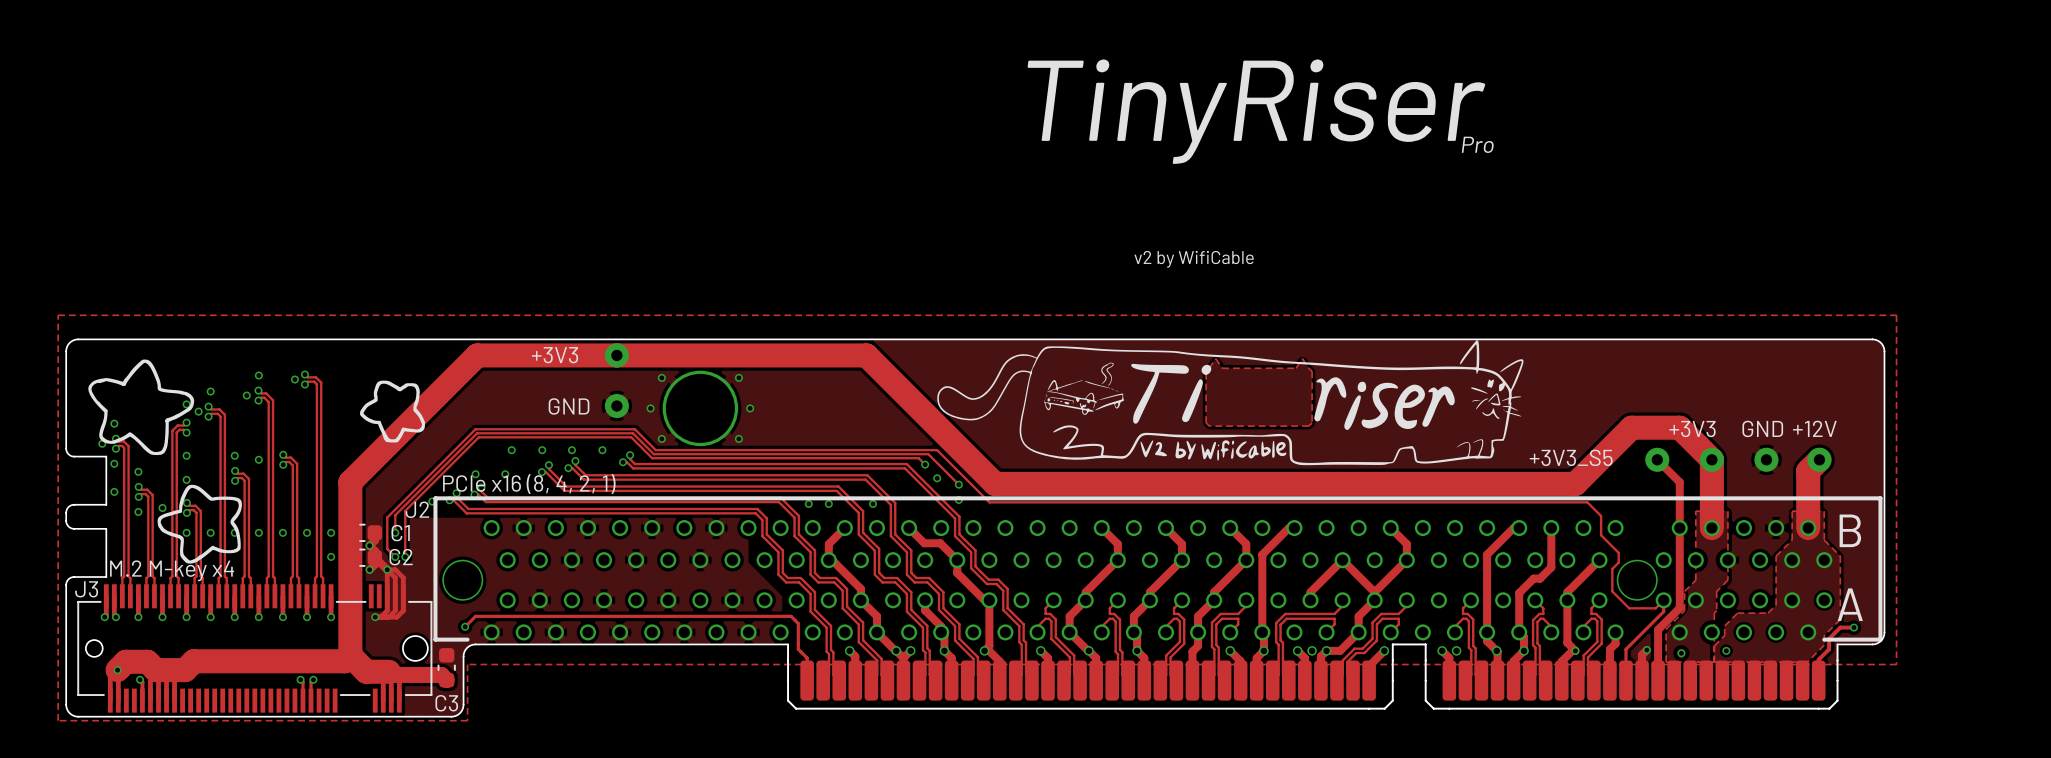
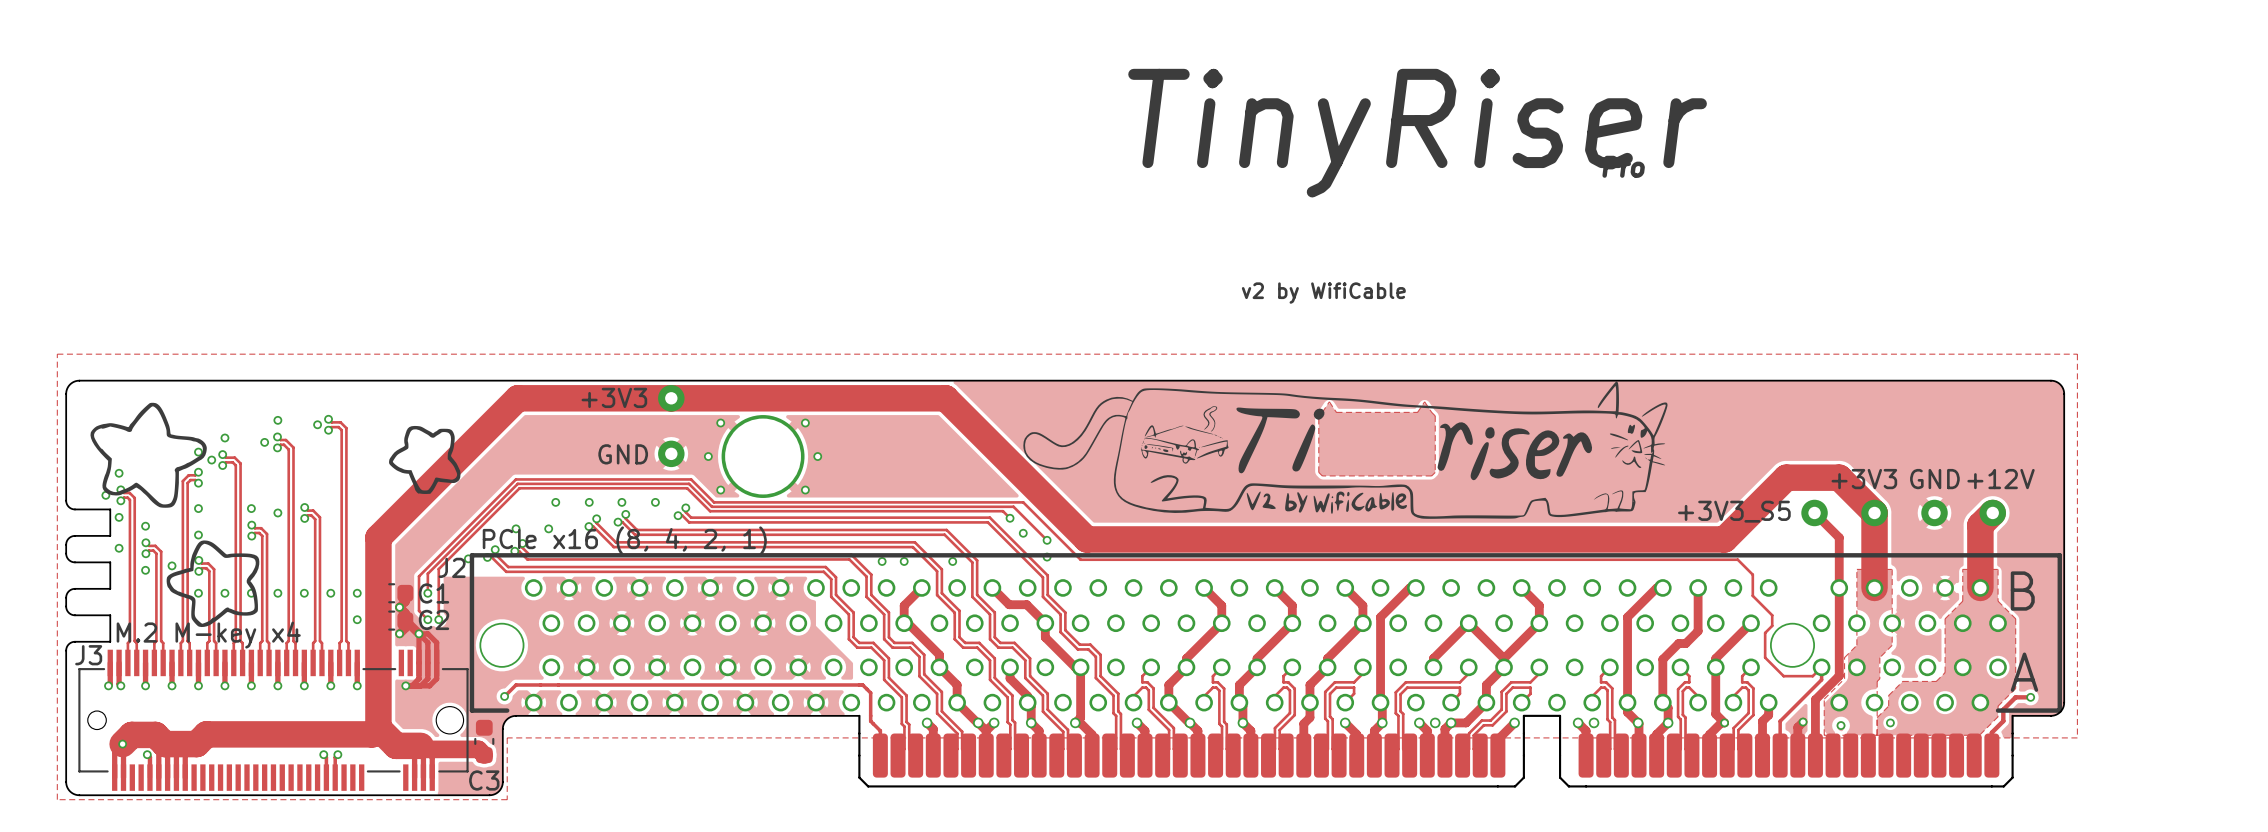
board edge: (106, 480) (106, 504) -> (110, 535) (74, 535) (69, 537) (66, 543) (66, 555) (69, 560) (74, 562)
board edge: (74, 504) (68, 507) (66, 512) (67, 524) (74, 528) -> none
board edge: none -> (110, 562) (110, 588)
board edge: (106, 528) (106, 552) -> (74, 588) (69, 590) (66, 595) (66, 607) (69, 613) (74, 615) (110, 615)

